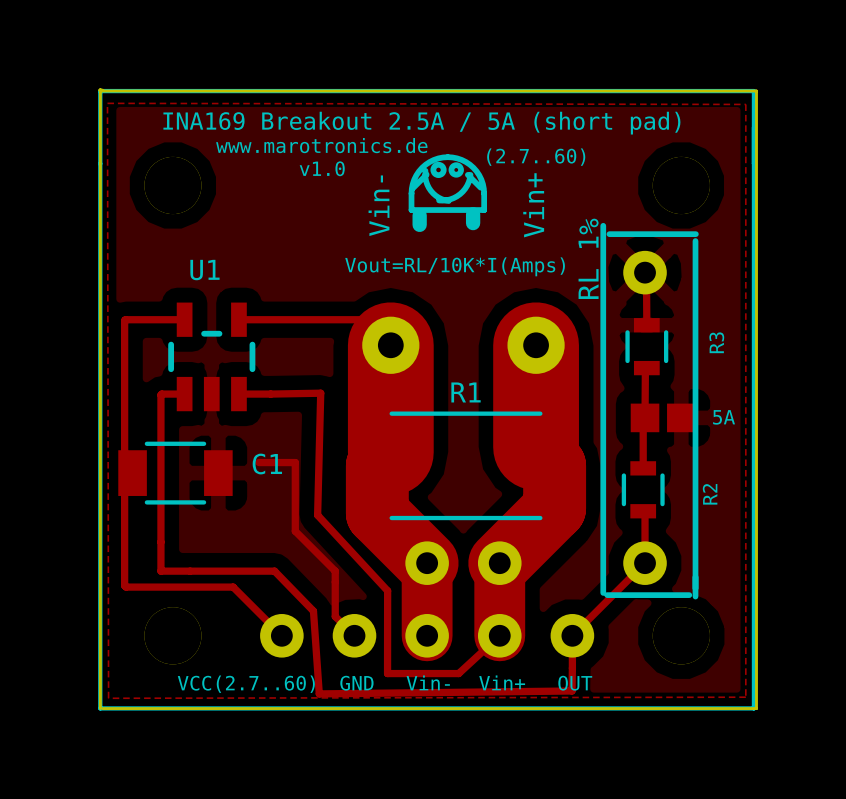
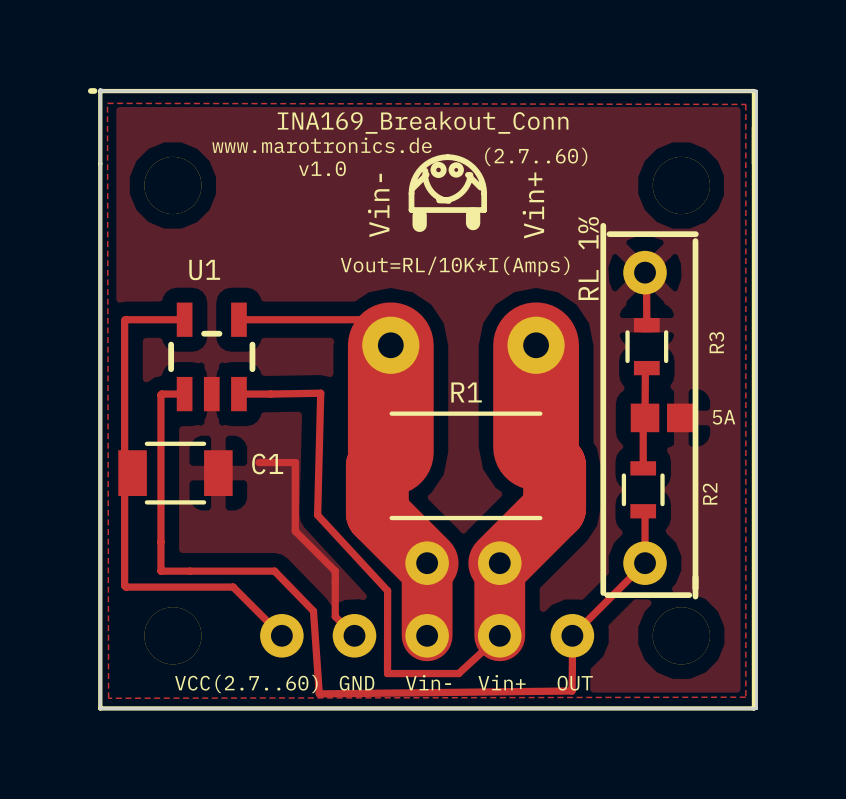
line: none -> (90, 90) (94, 90)
part value: INA169 Breakout 2.5A / 5A (short pad) (421, 123) -> INA169_Breakout_Conn (423, 122)

